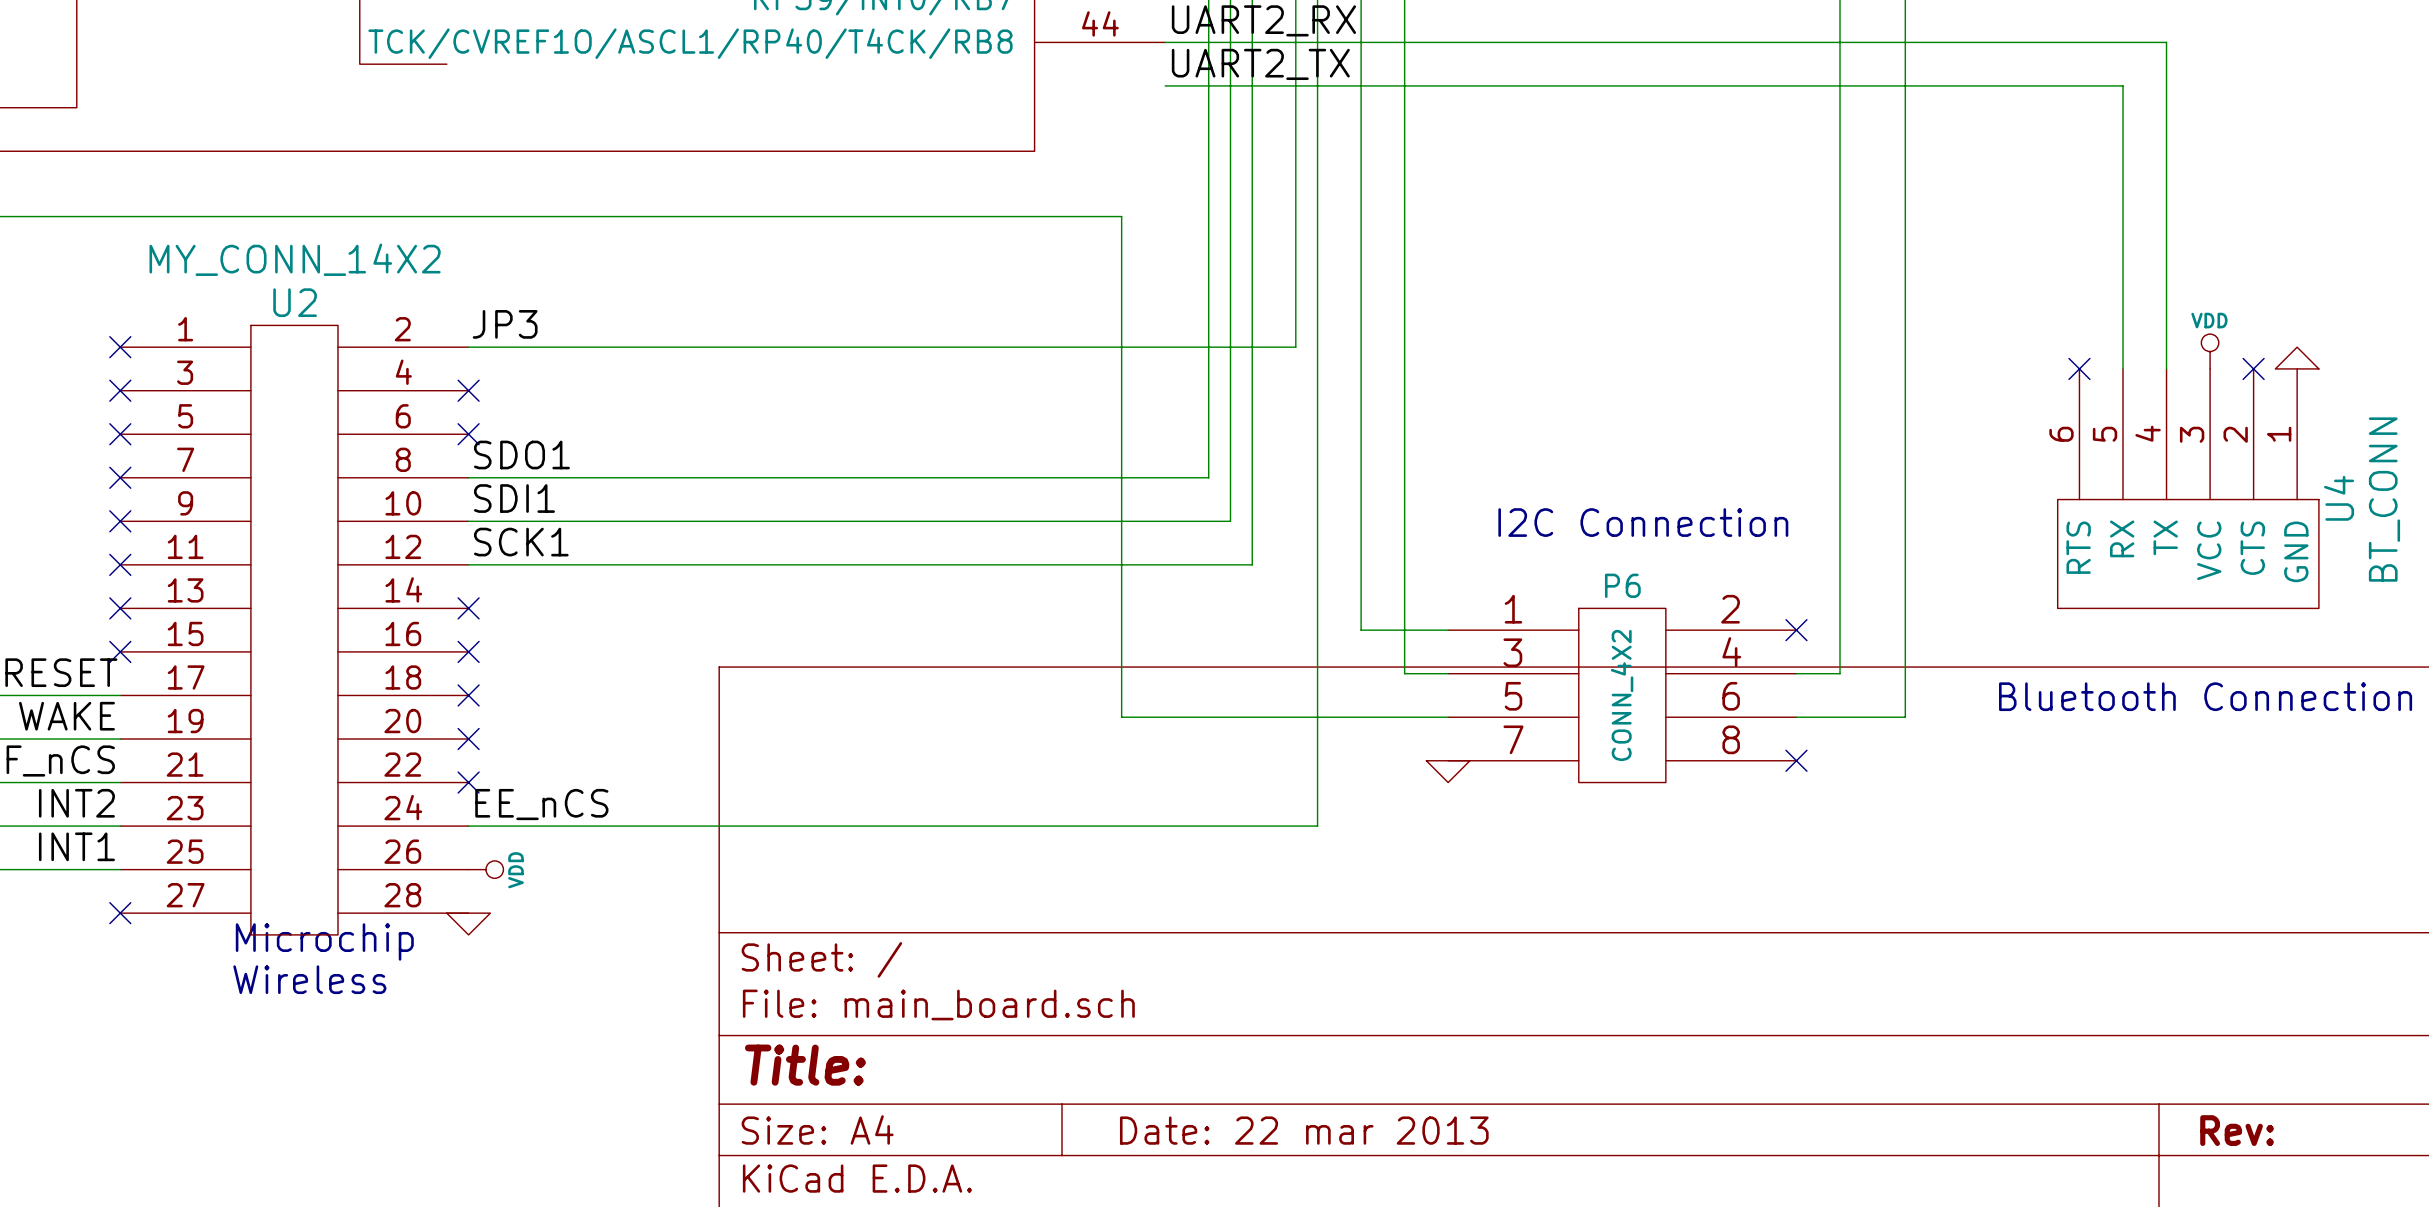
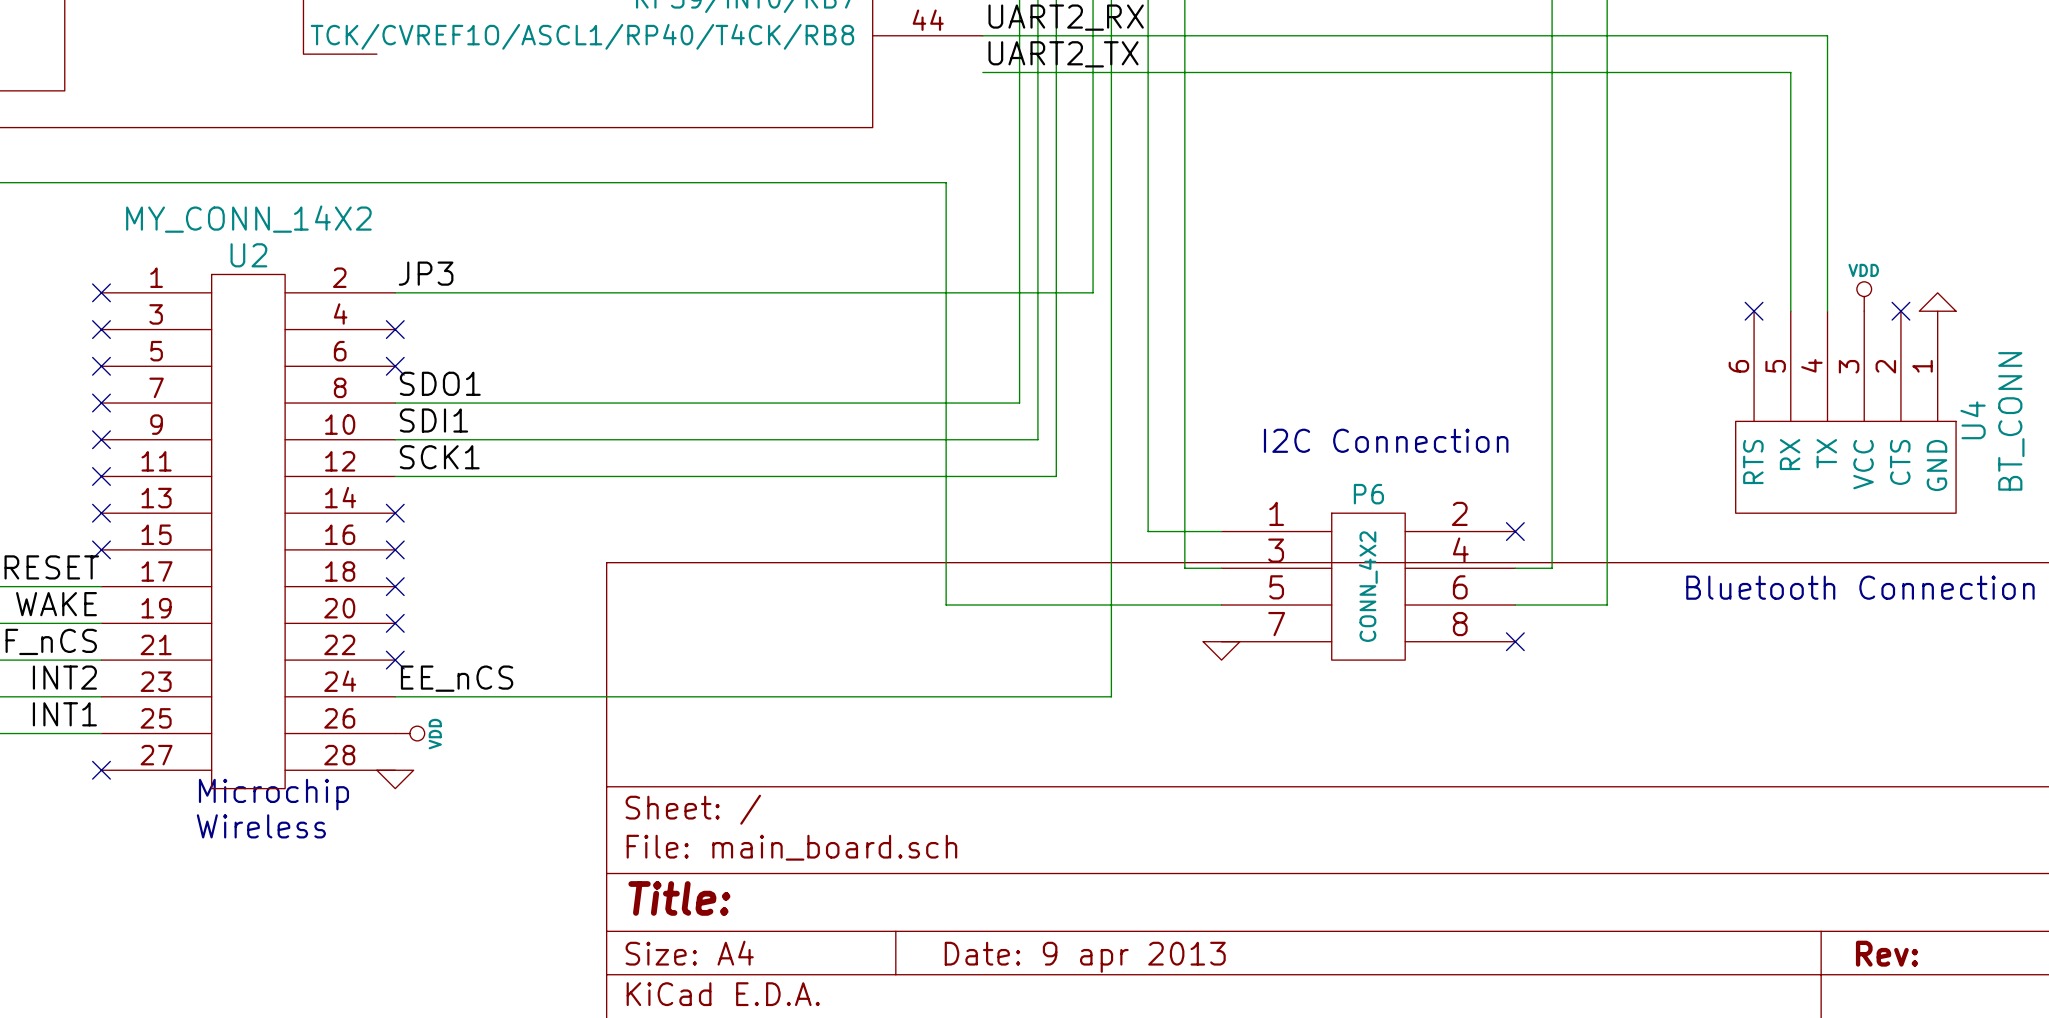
title block: Date: 22 mar 2013 (1304, 1130) -> Date: 9 apr 2013 (1085, 957)

